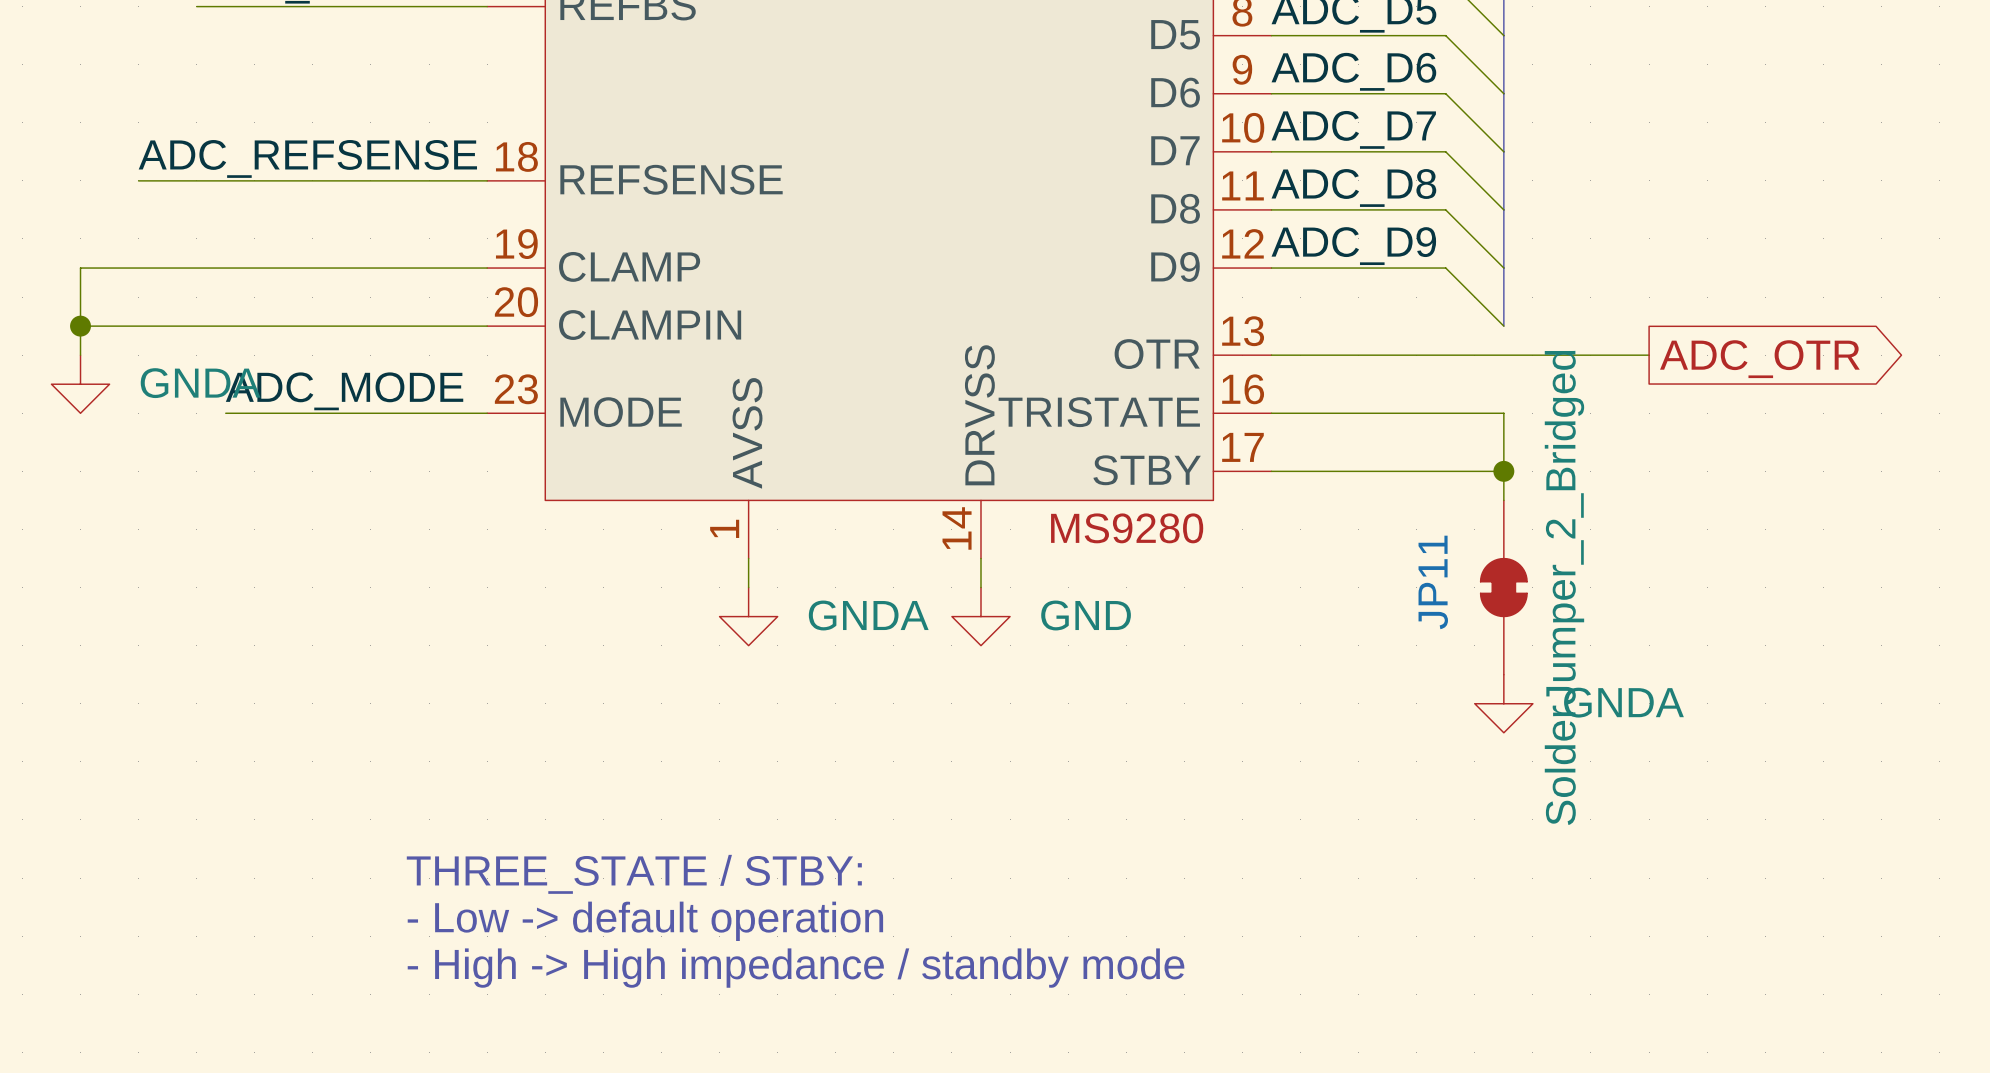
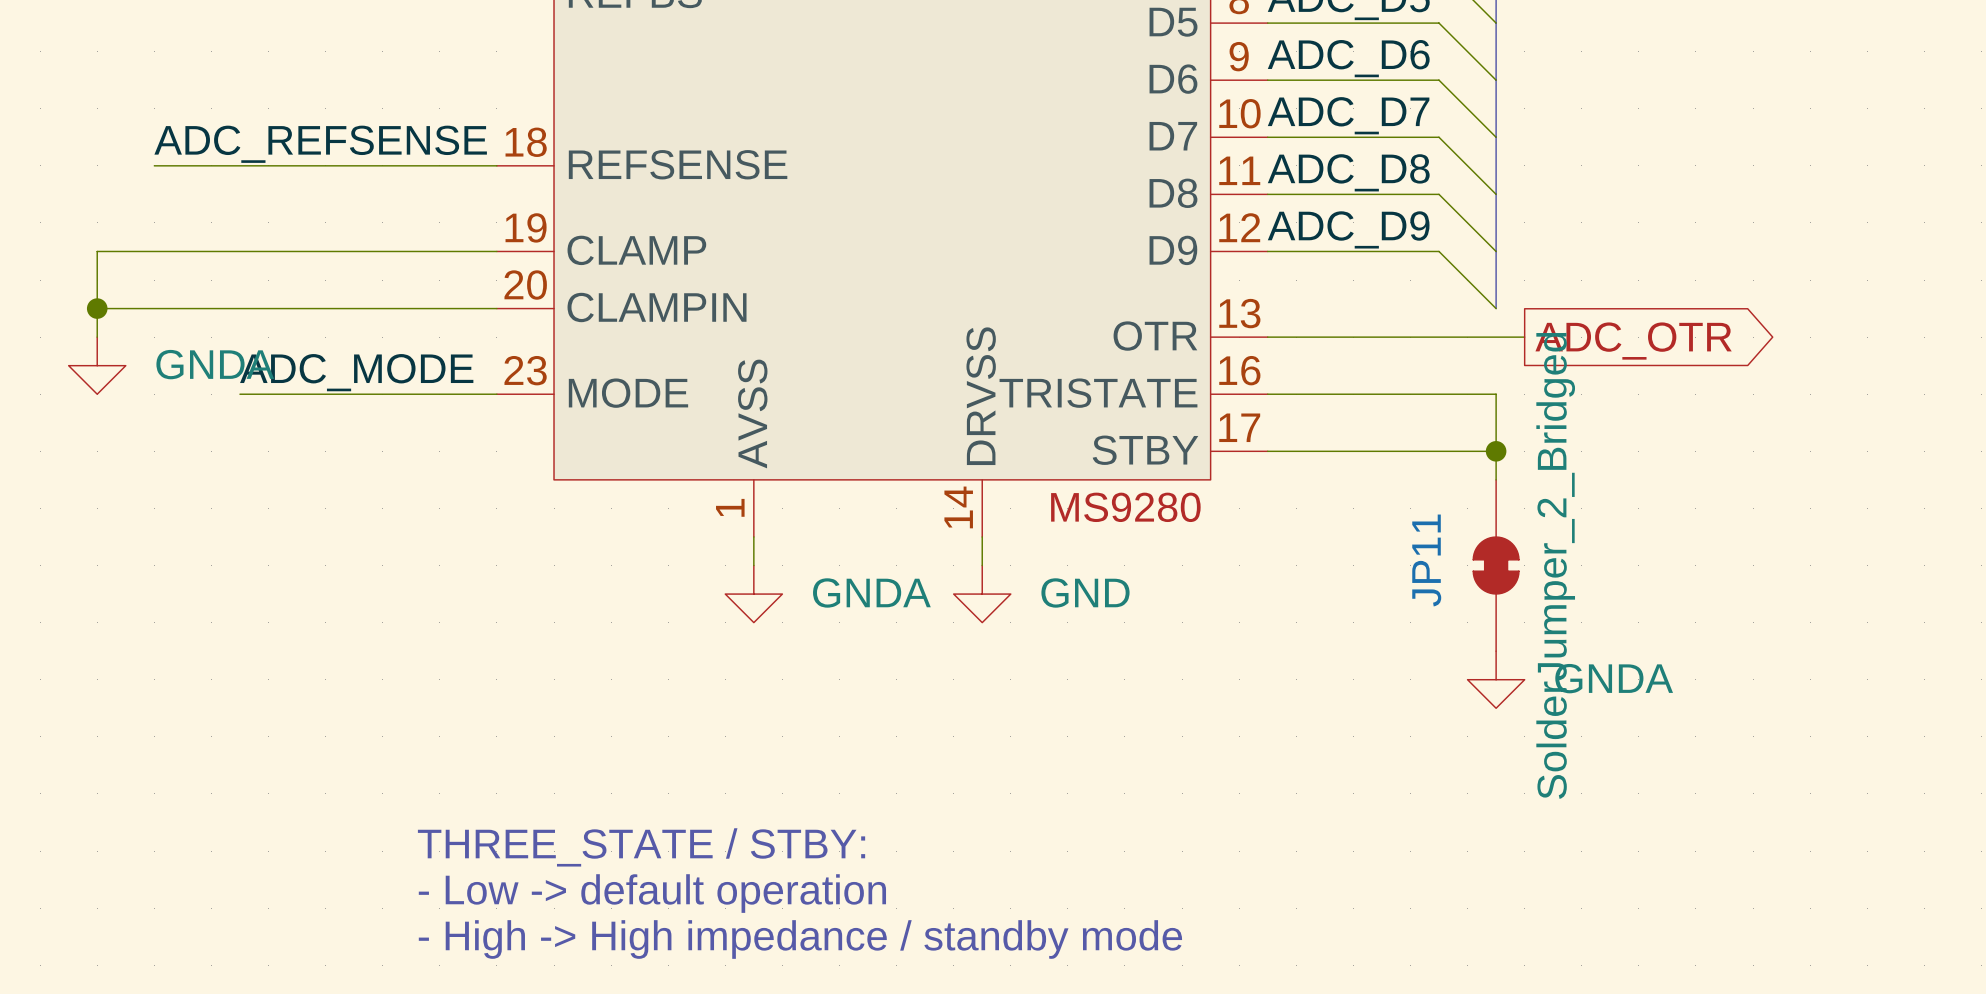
wire: (1532, 355) (1649, 355) -> none
global label position: ADC_OTR (1759, 359) -> ADC_OTR (1633, 341)

